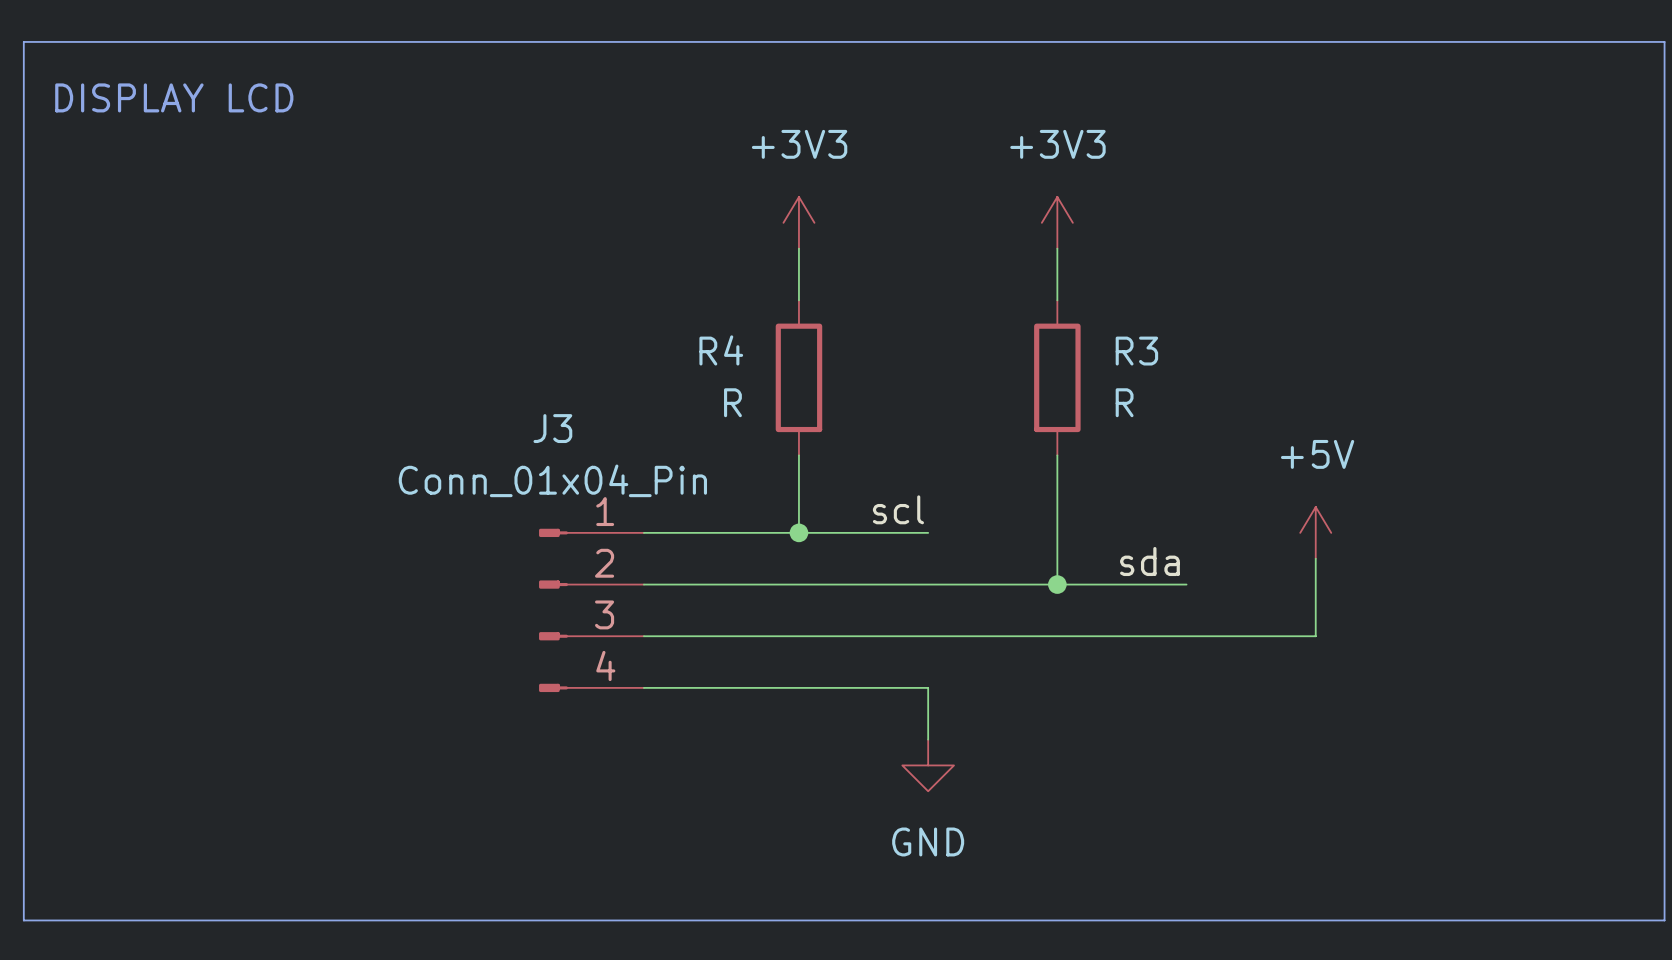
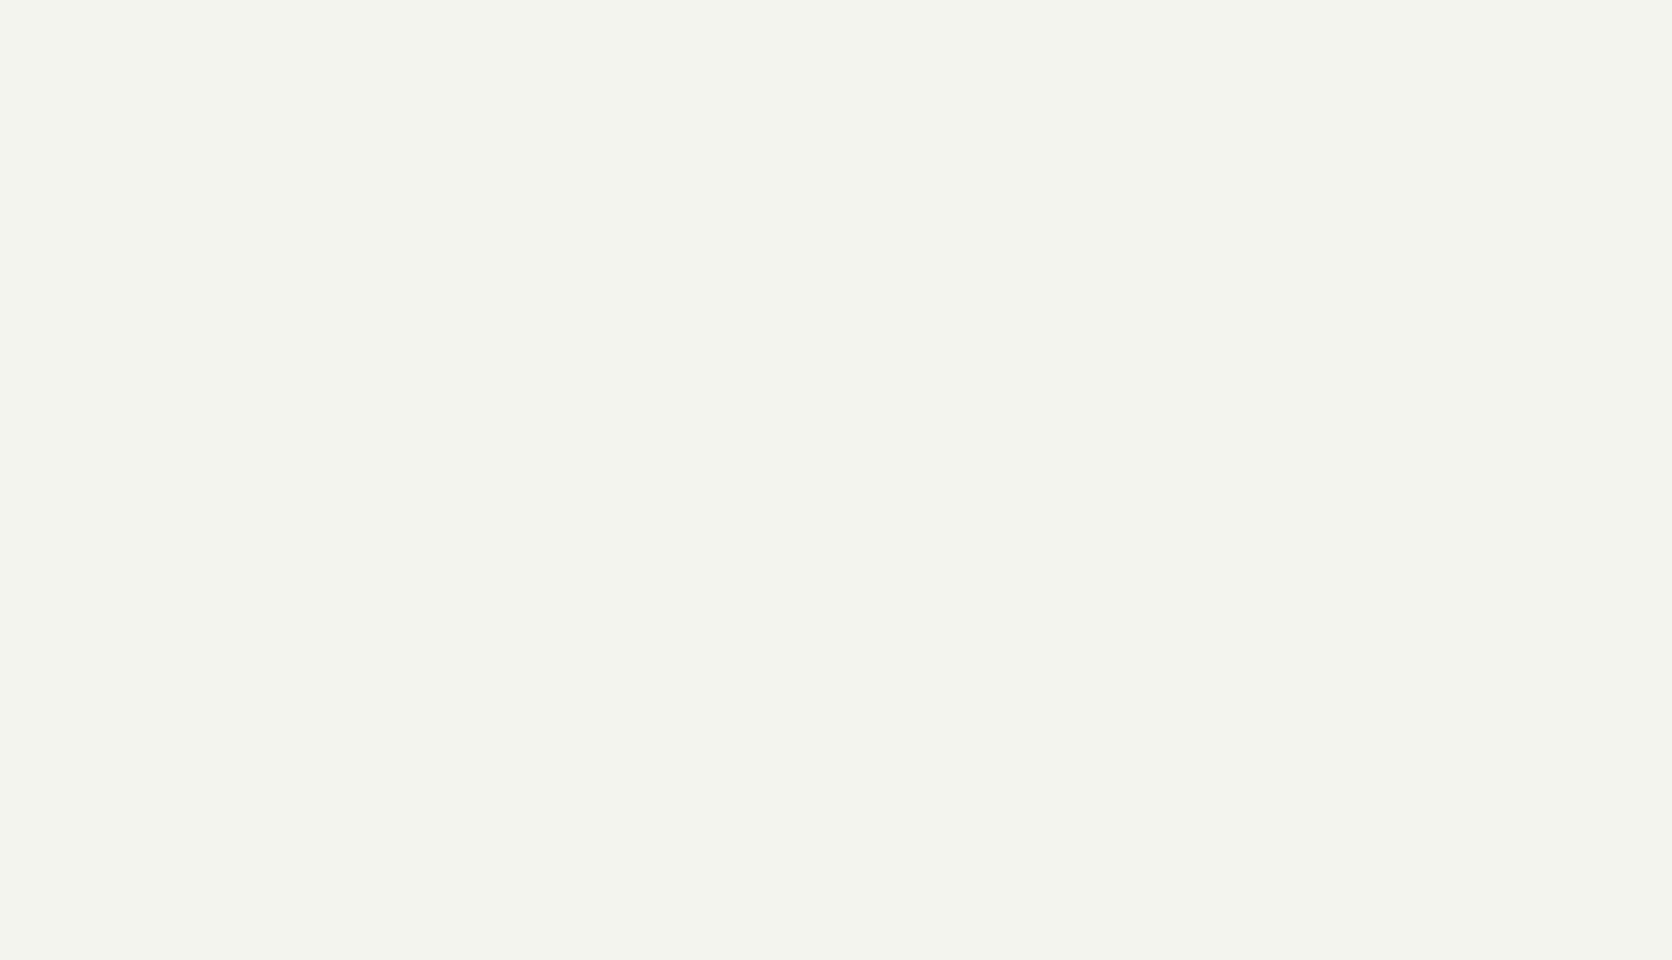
line: (23, 41) (1664, 41) (1664, 920) (23, 920) (23, 41) -> none
text: DISPLAY LCD (174, 97) -> none
power symbol: +3V3 (798, 222) -> none
power symbol: +3V3 (1057, 222) -> none
wire: (798, 248) (798, 300) -> none
wire: (1057, 248) (1057, 300) -> none
R4: R (798, 377) -> none
R3: R (1057, 377) -> none
wire: (798, 455) (798, 532) -> none
wire: (1057, 455) (1057, 584) -> none
label: scl (898, 509) -> none
wire: (643, 532) (928, 532) -> none
junction: (798, 532) -> none
power symbol: +5V (1315, 532) -> none
wire: (1315, 558) (1315, 636) (643, 636) -> none
label: sda (1149, 561) -> none
wire: (643, 584) (1186, 584) -> none
junction: (1057, 584) -> none
J3: Conn_01x04_Pin (591, 610) -> none
wire: (643, 687) (928, 687) (928, 739) -> none
power symbol: GND (928, 765) -> none

